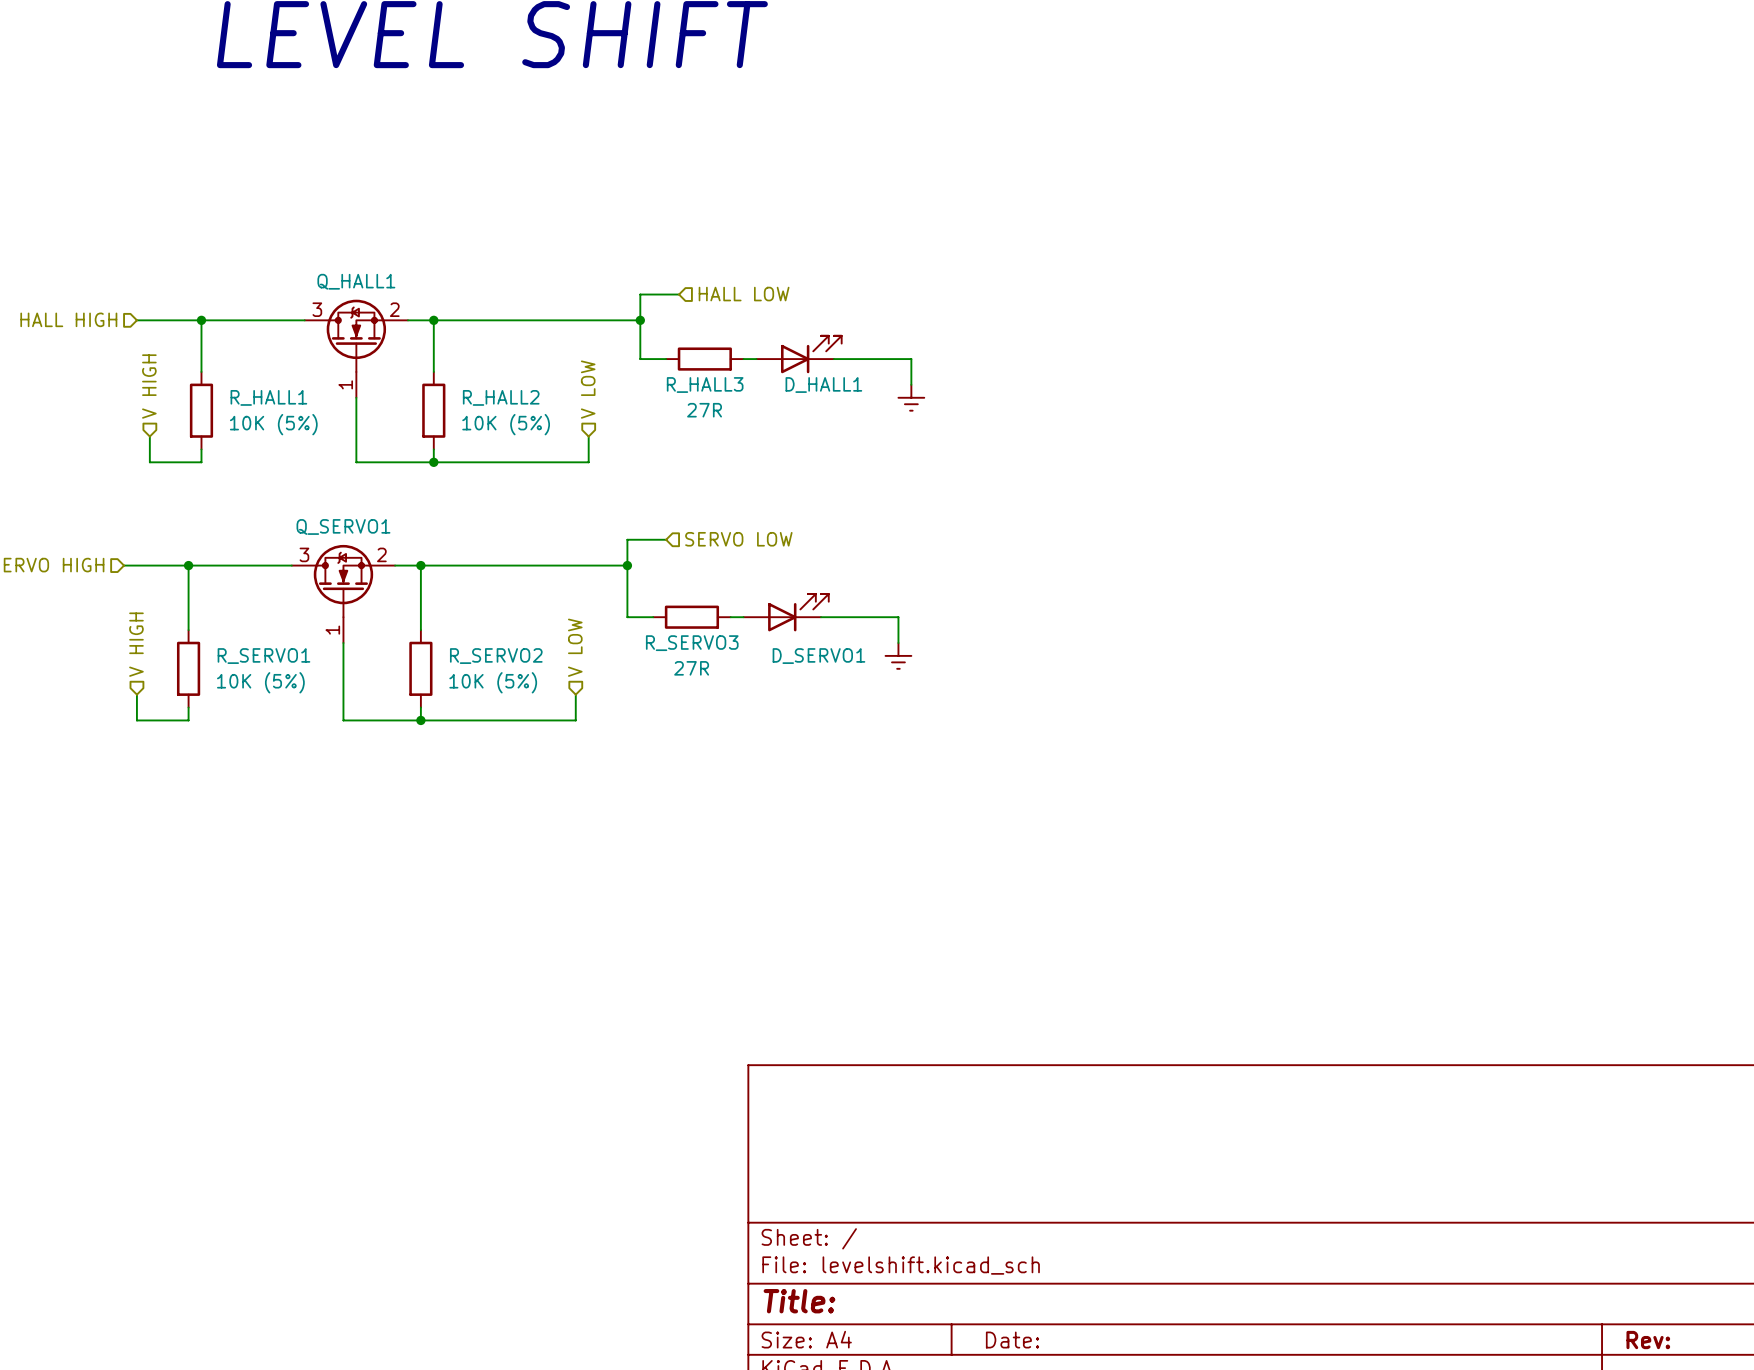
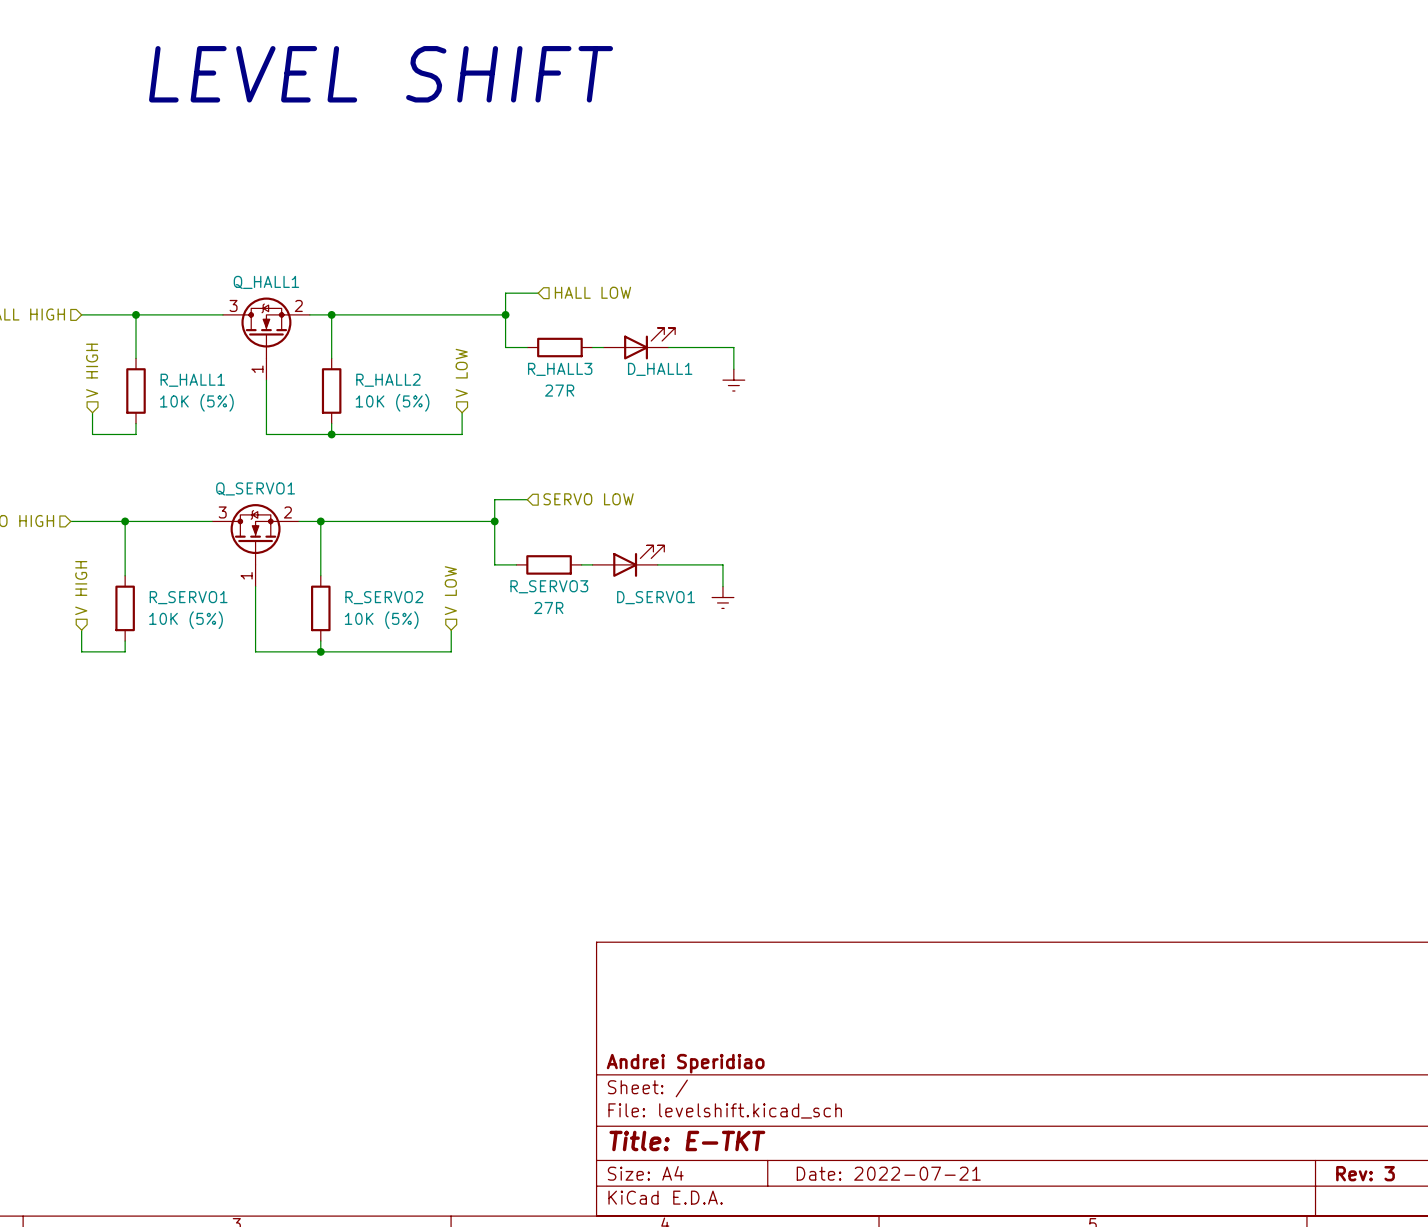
title block: none -> Andrei Speridiao (685, 1063)
title block: Title: (799, 1301) -> Title: E-TKT (687, 1140)
title block: Date: (1012, 1340) -> Date: 2022-07-21 (888, 1173)
title block: Rev: (1648, 1340) -> Rev: 3 (1365, 1173)

